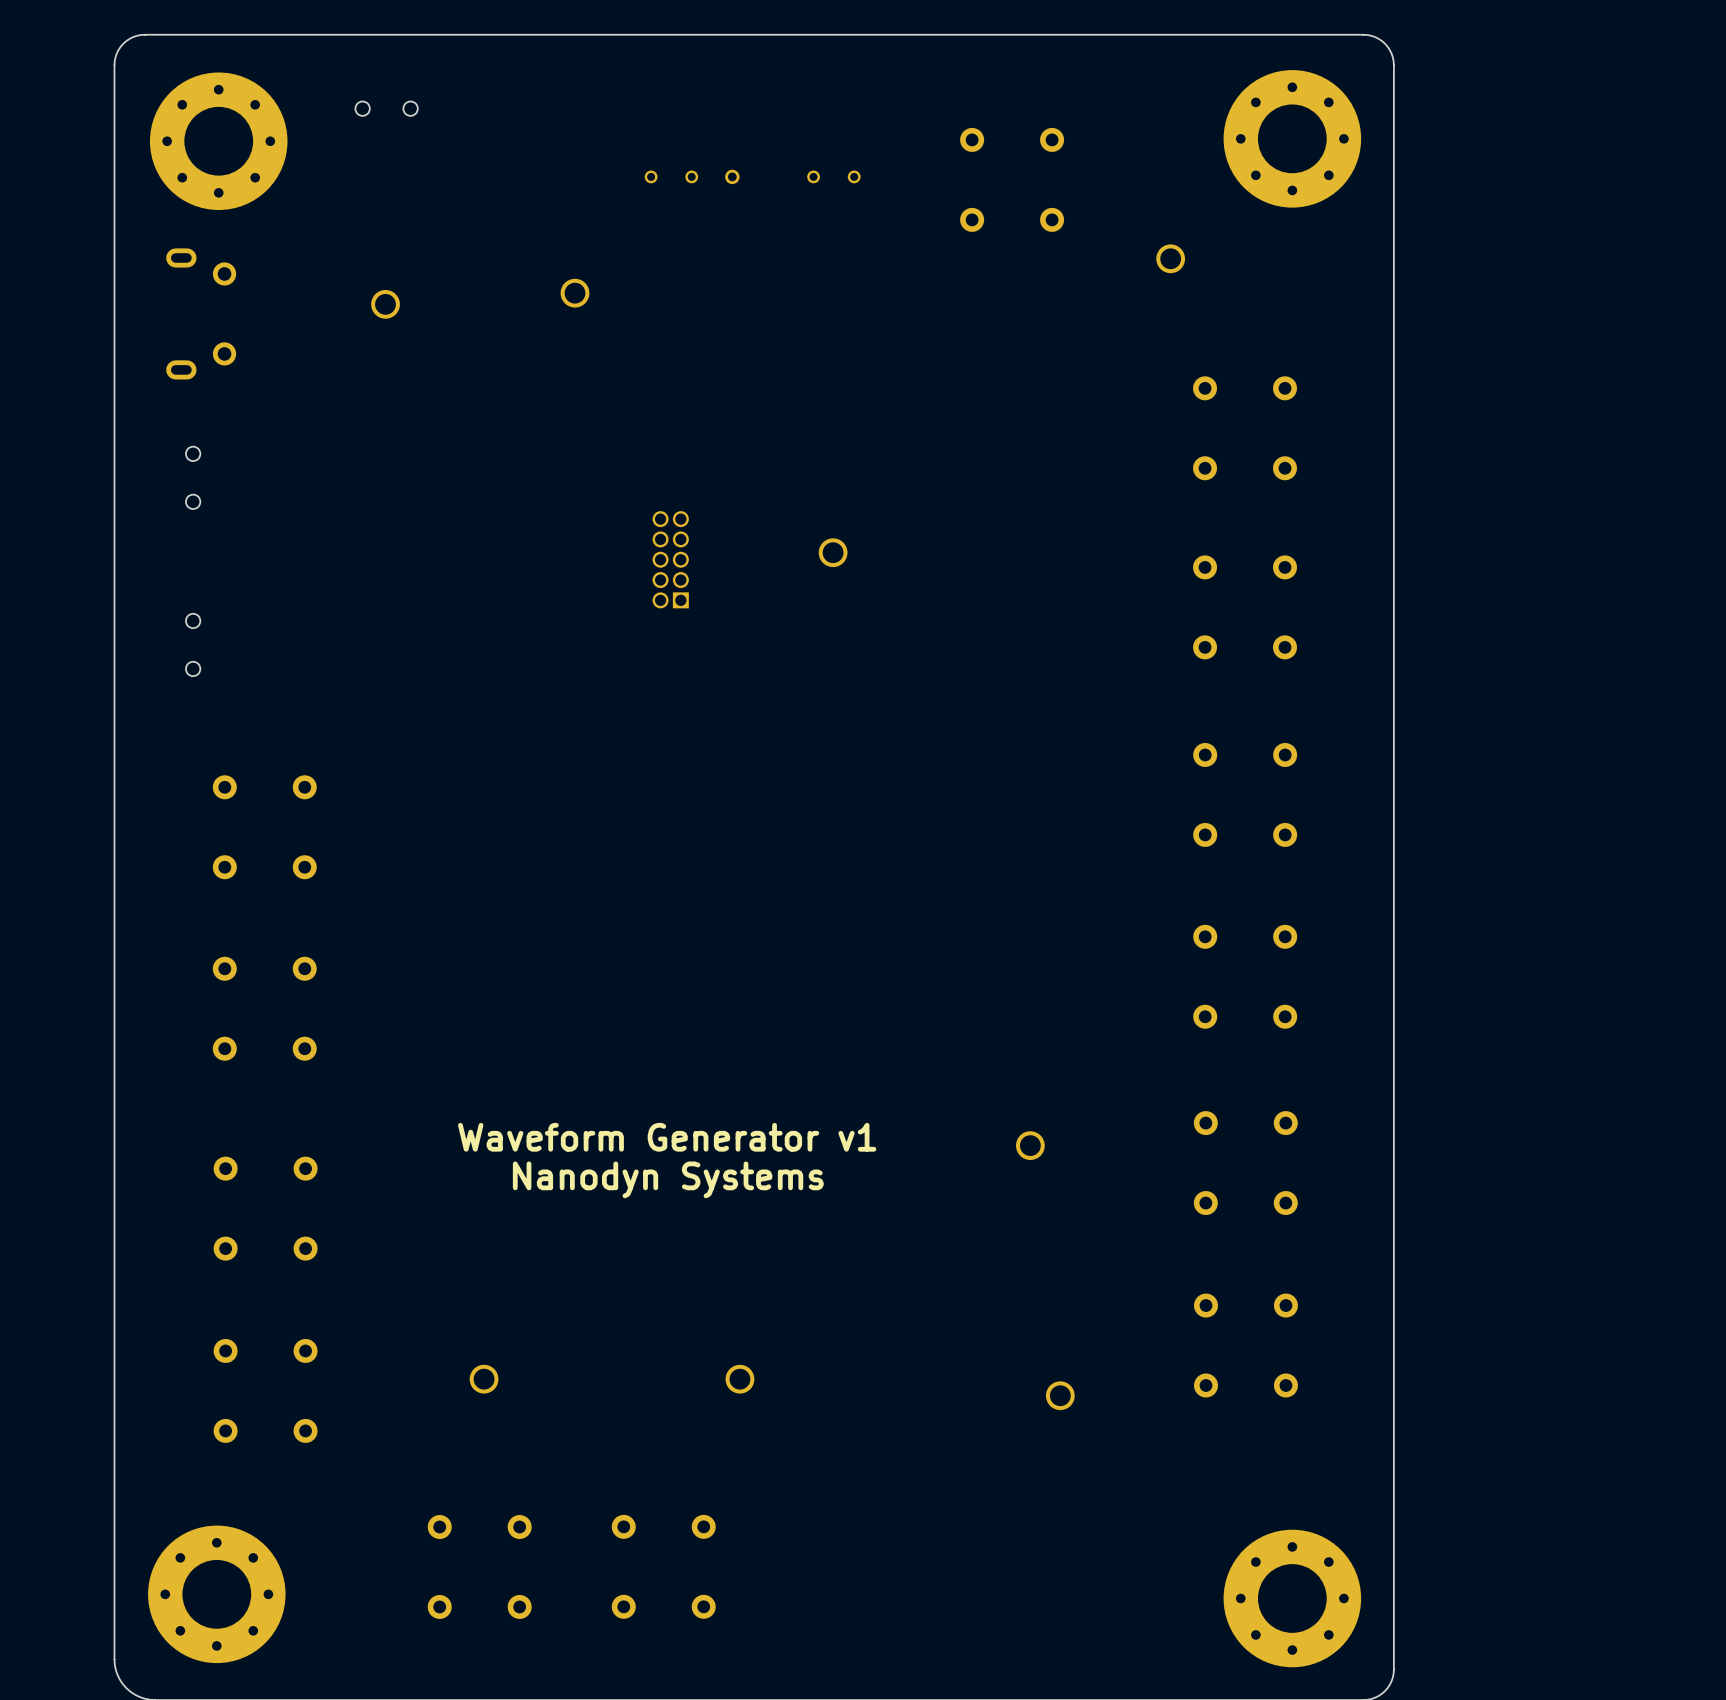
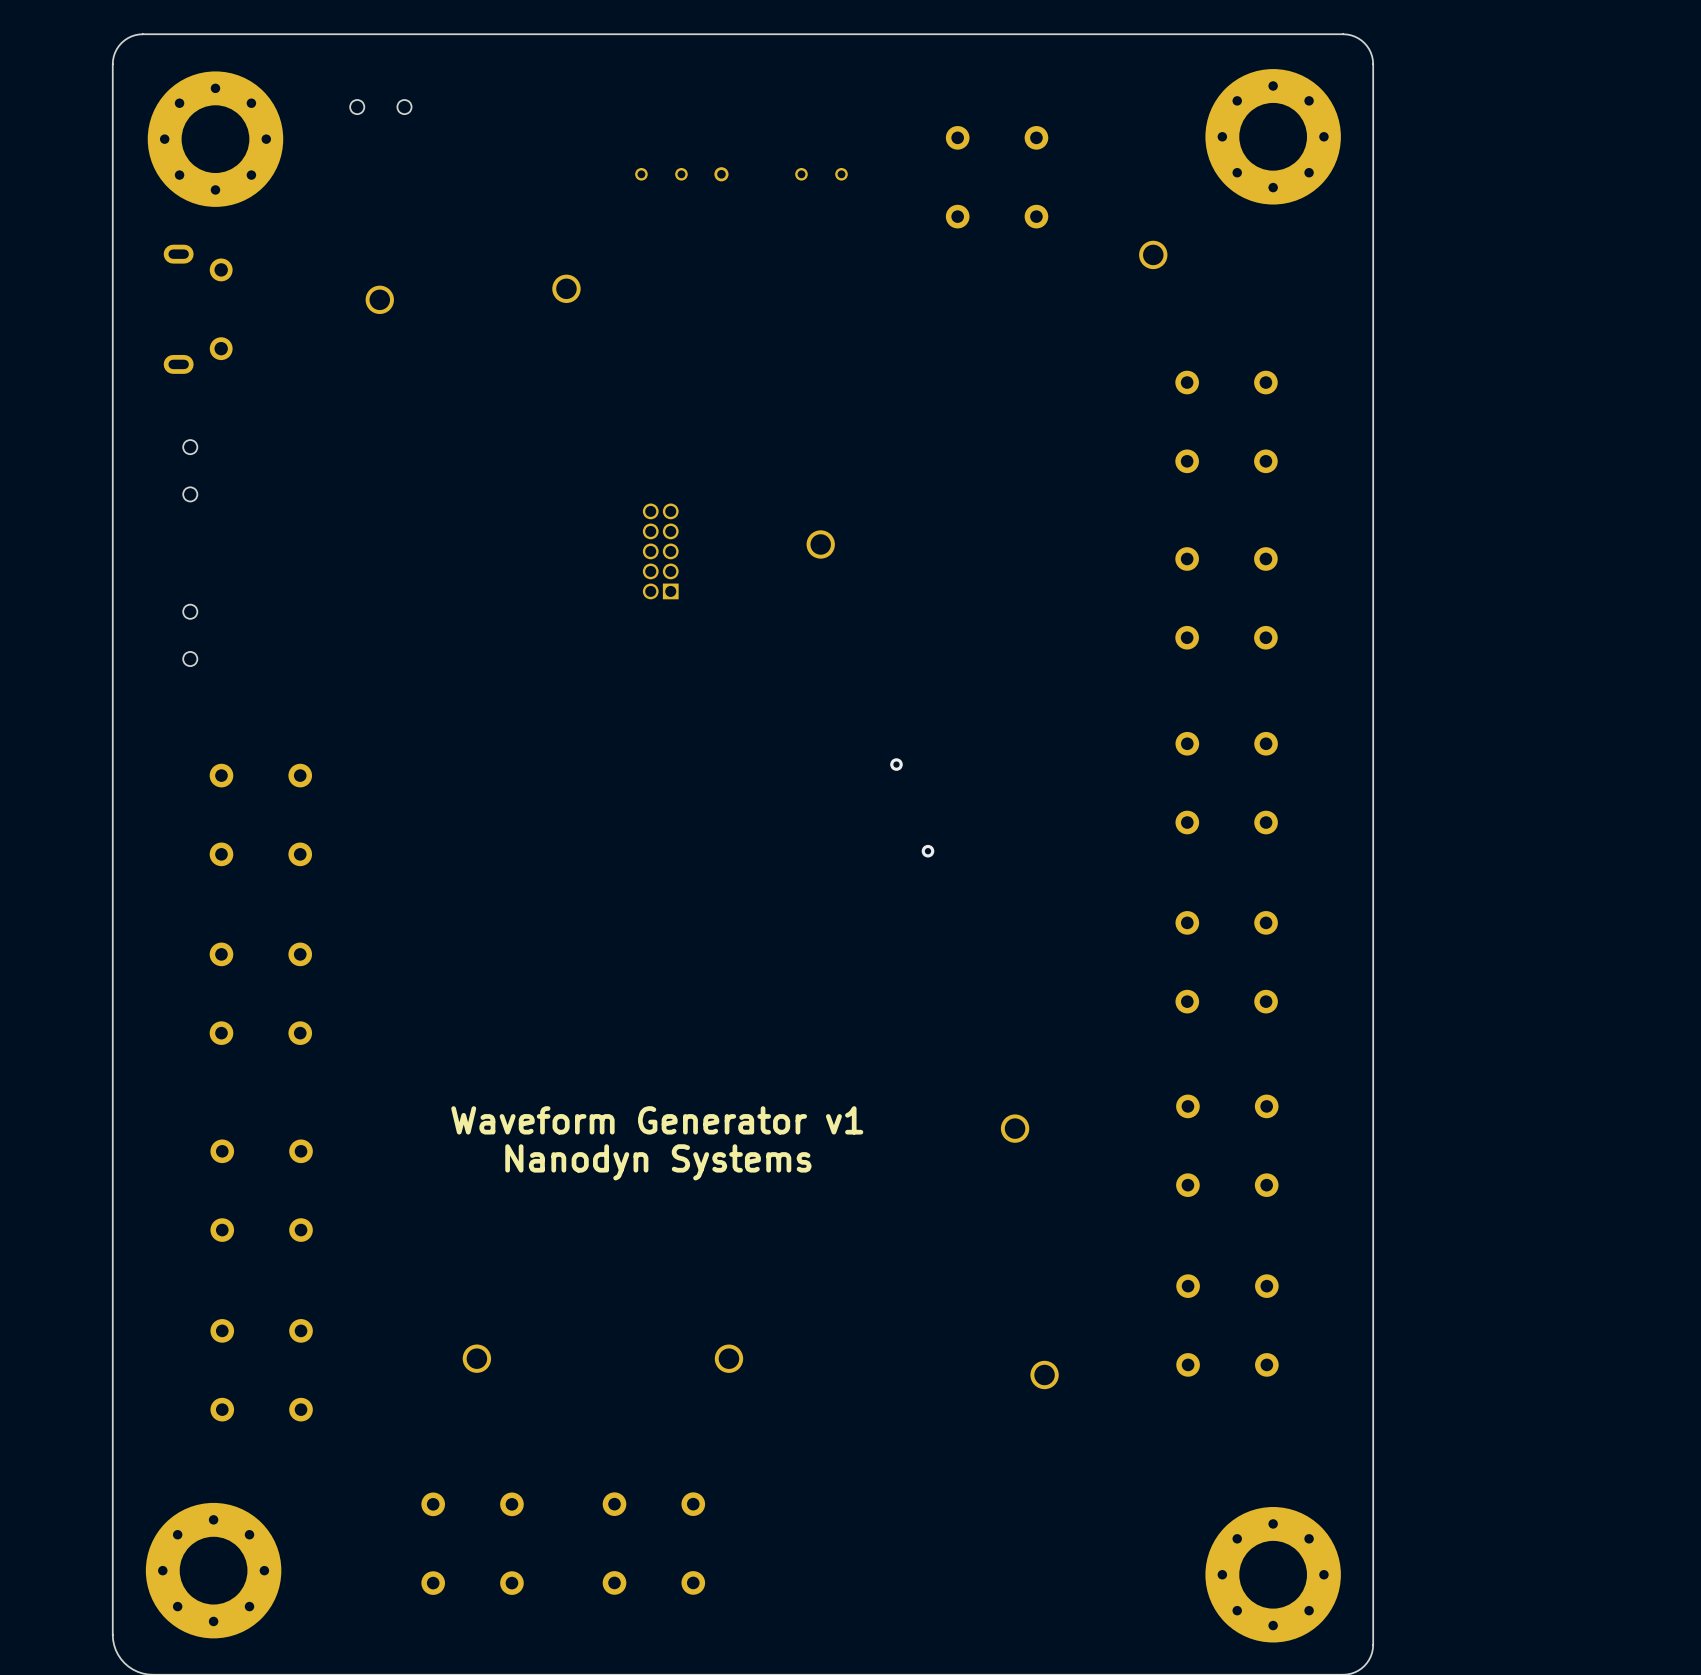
via: none -> (896, 764)
via: none -> (928, 851)

